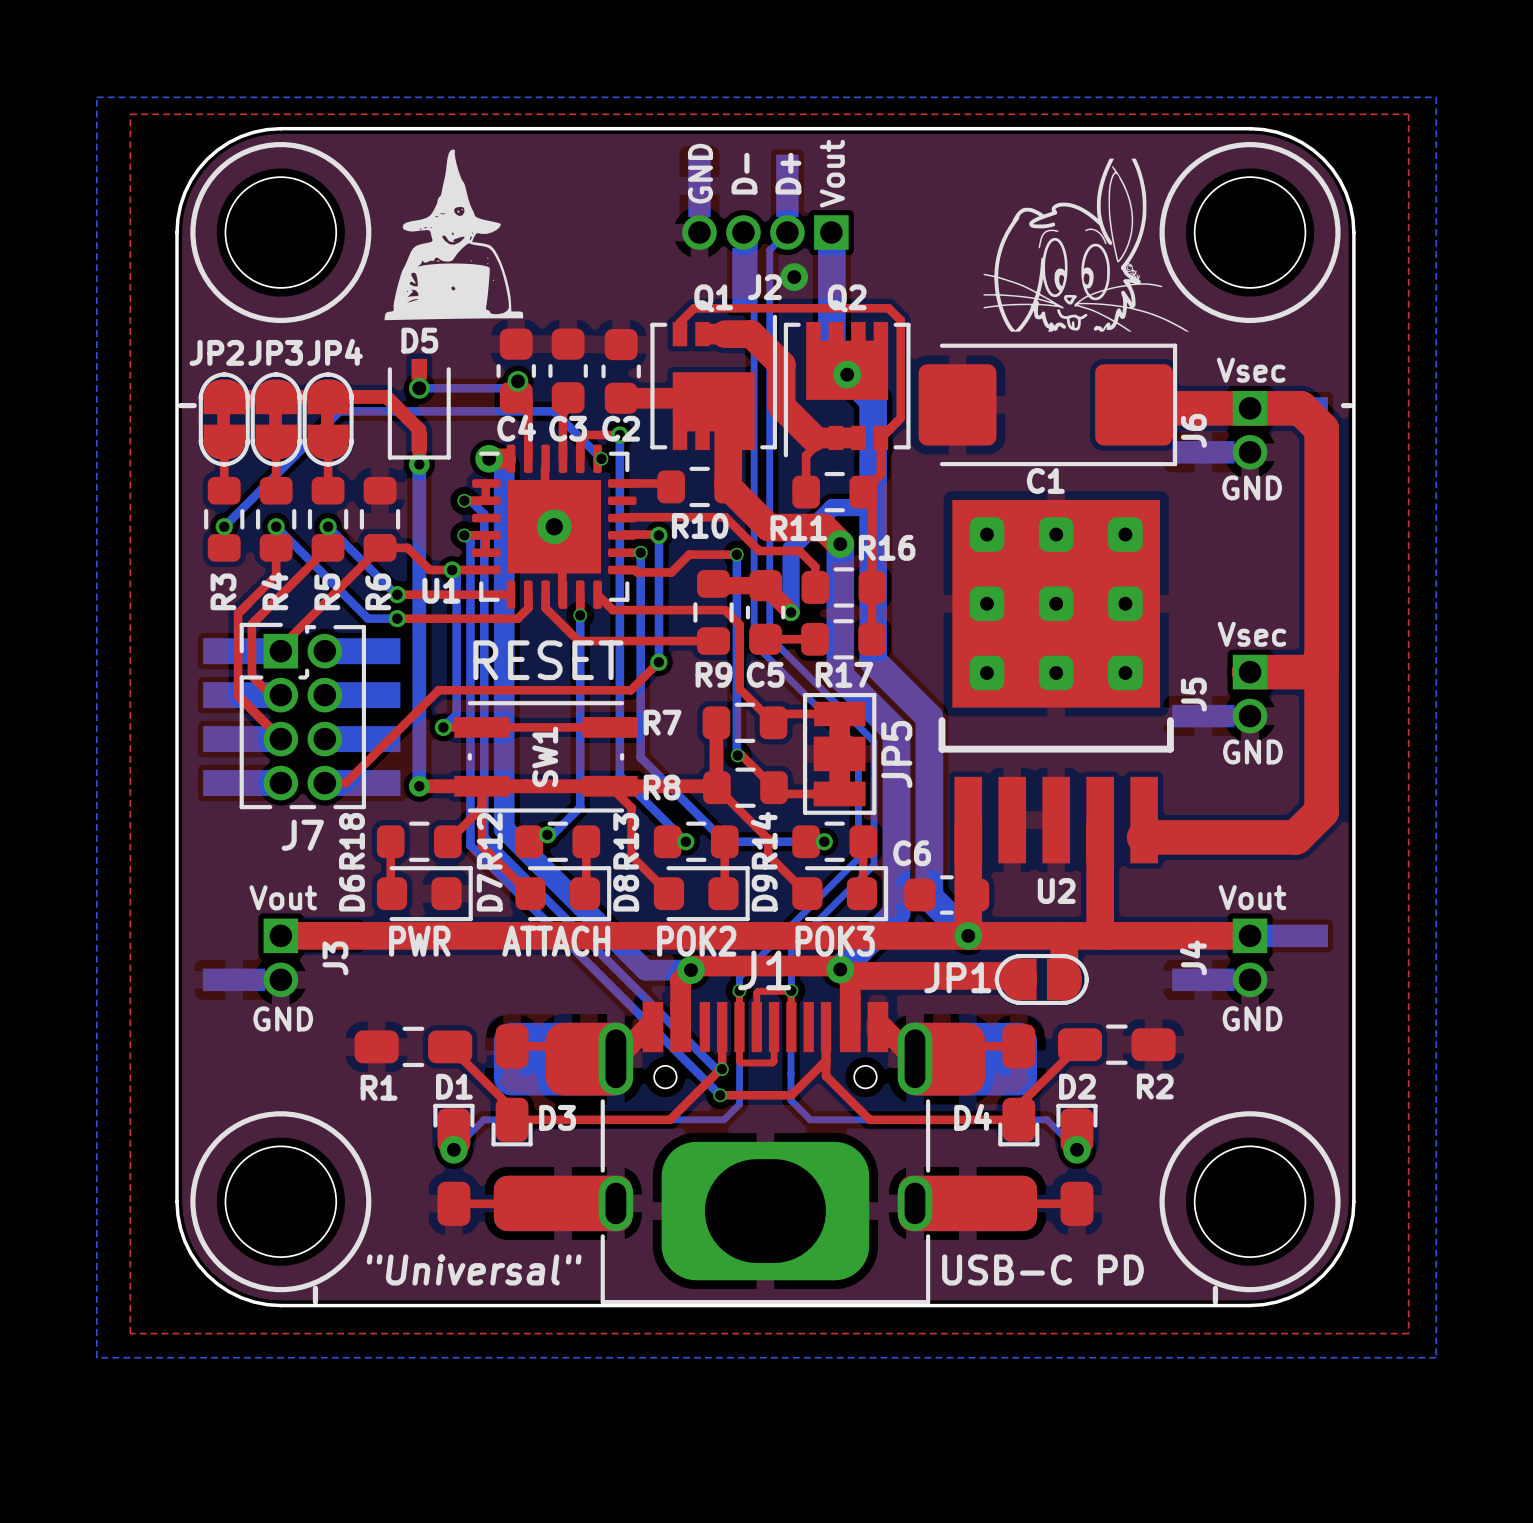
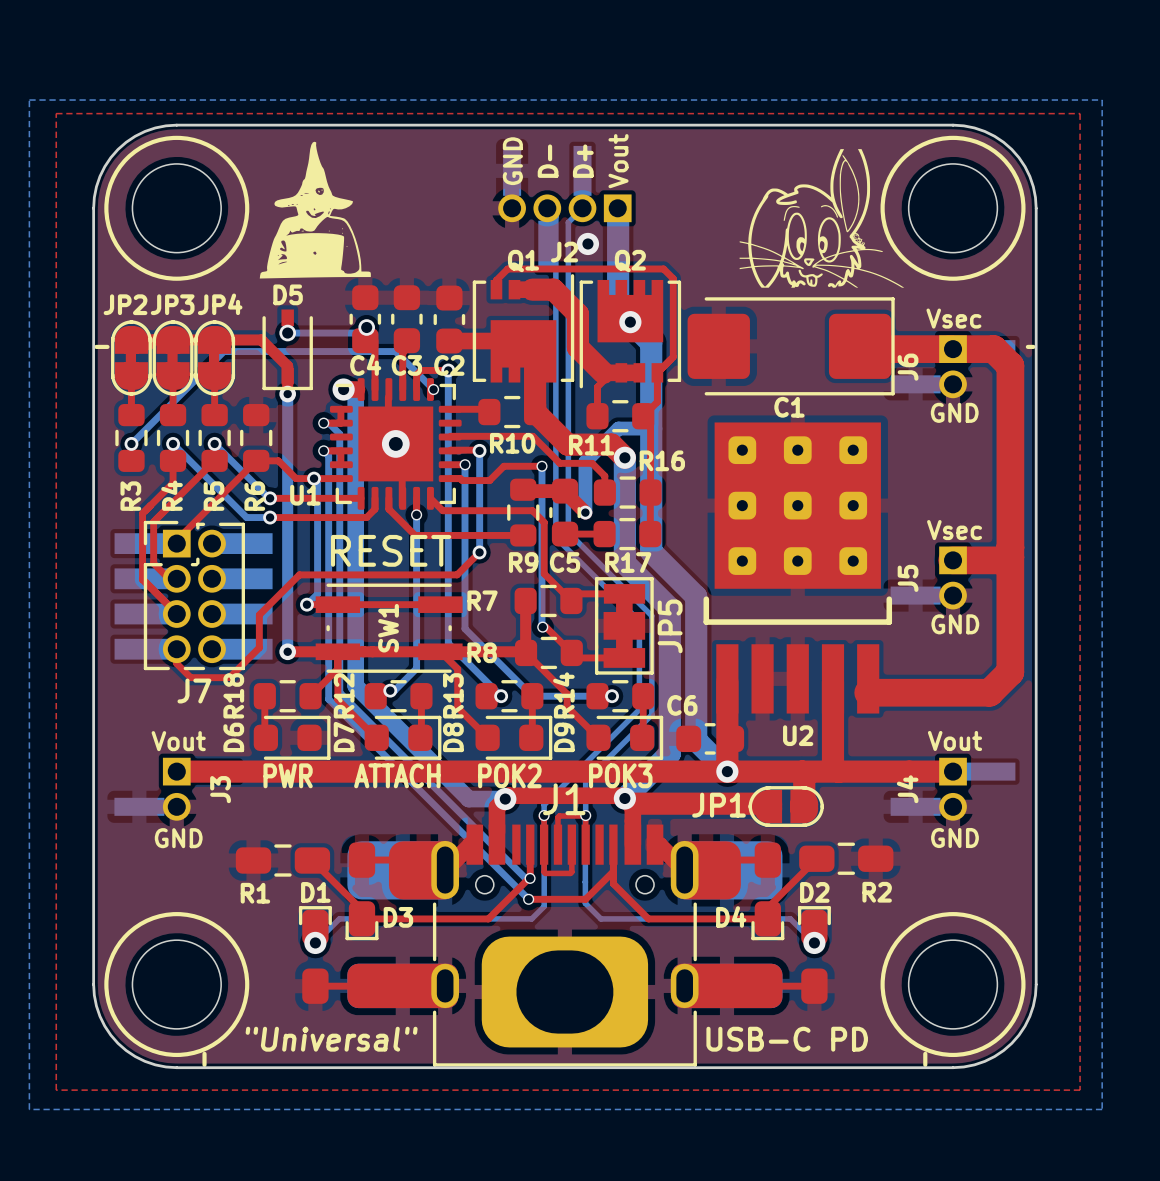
top track: (438, 690) (345, 783) (324, 783) -> (303, 574) (299, 574) (259, 614) (259, 647) (229, 677) (190, 677) (176, 663) (176, 649)

